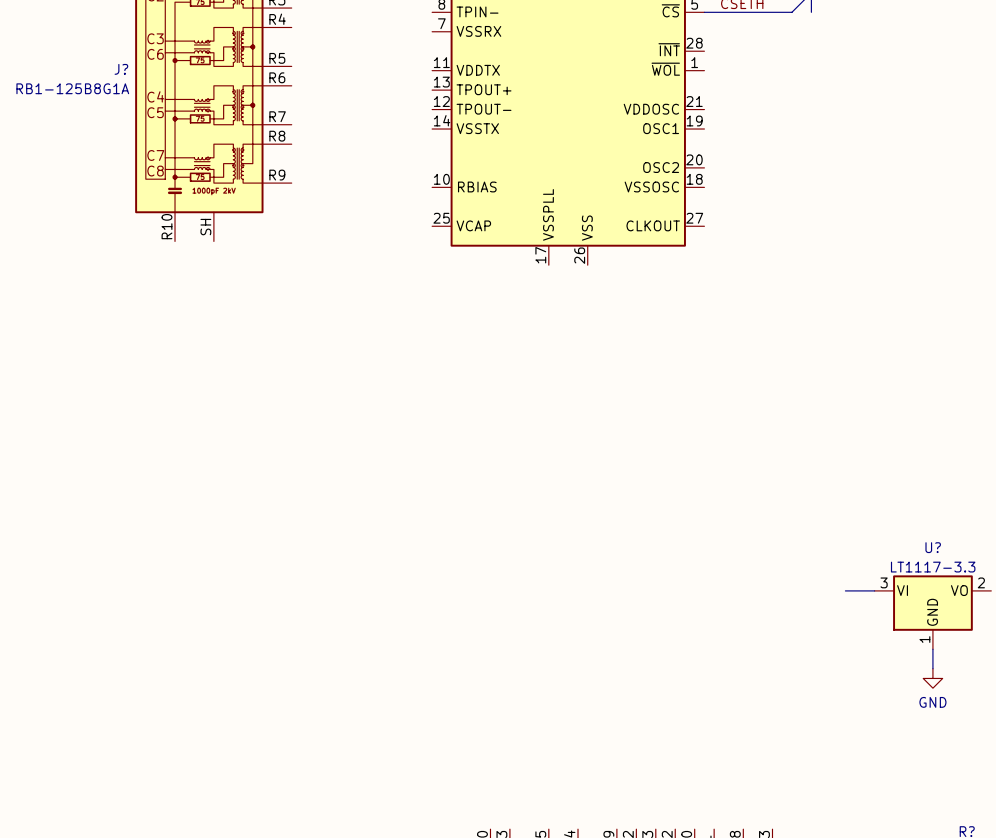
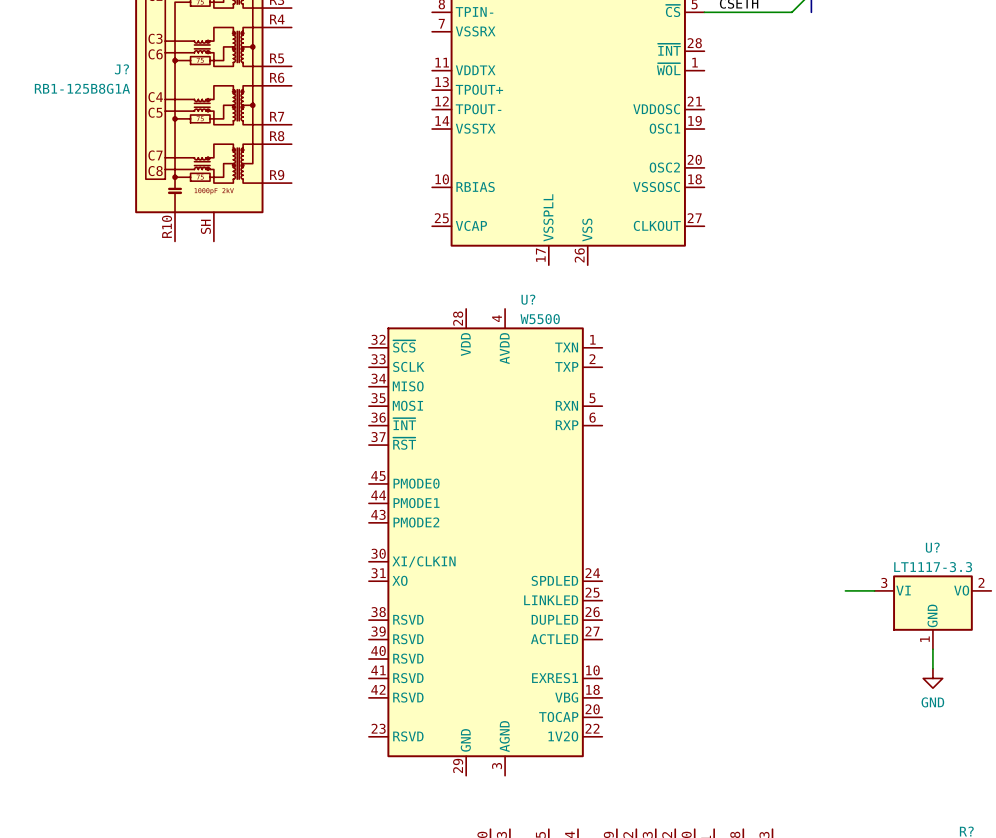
U?: none -> W5500 (485, 542)

